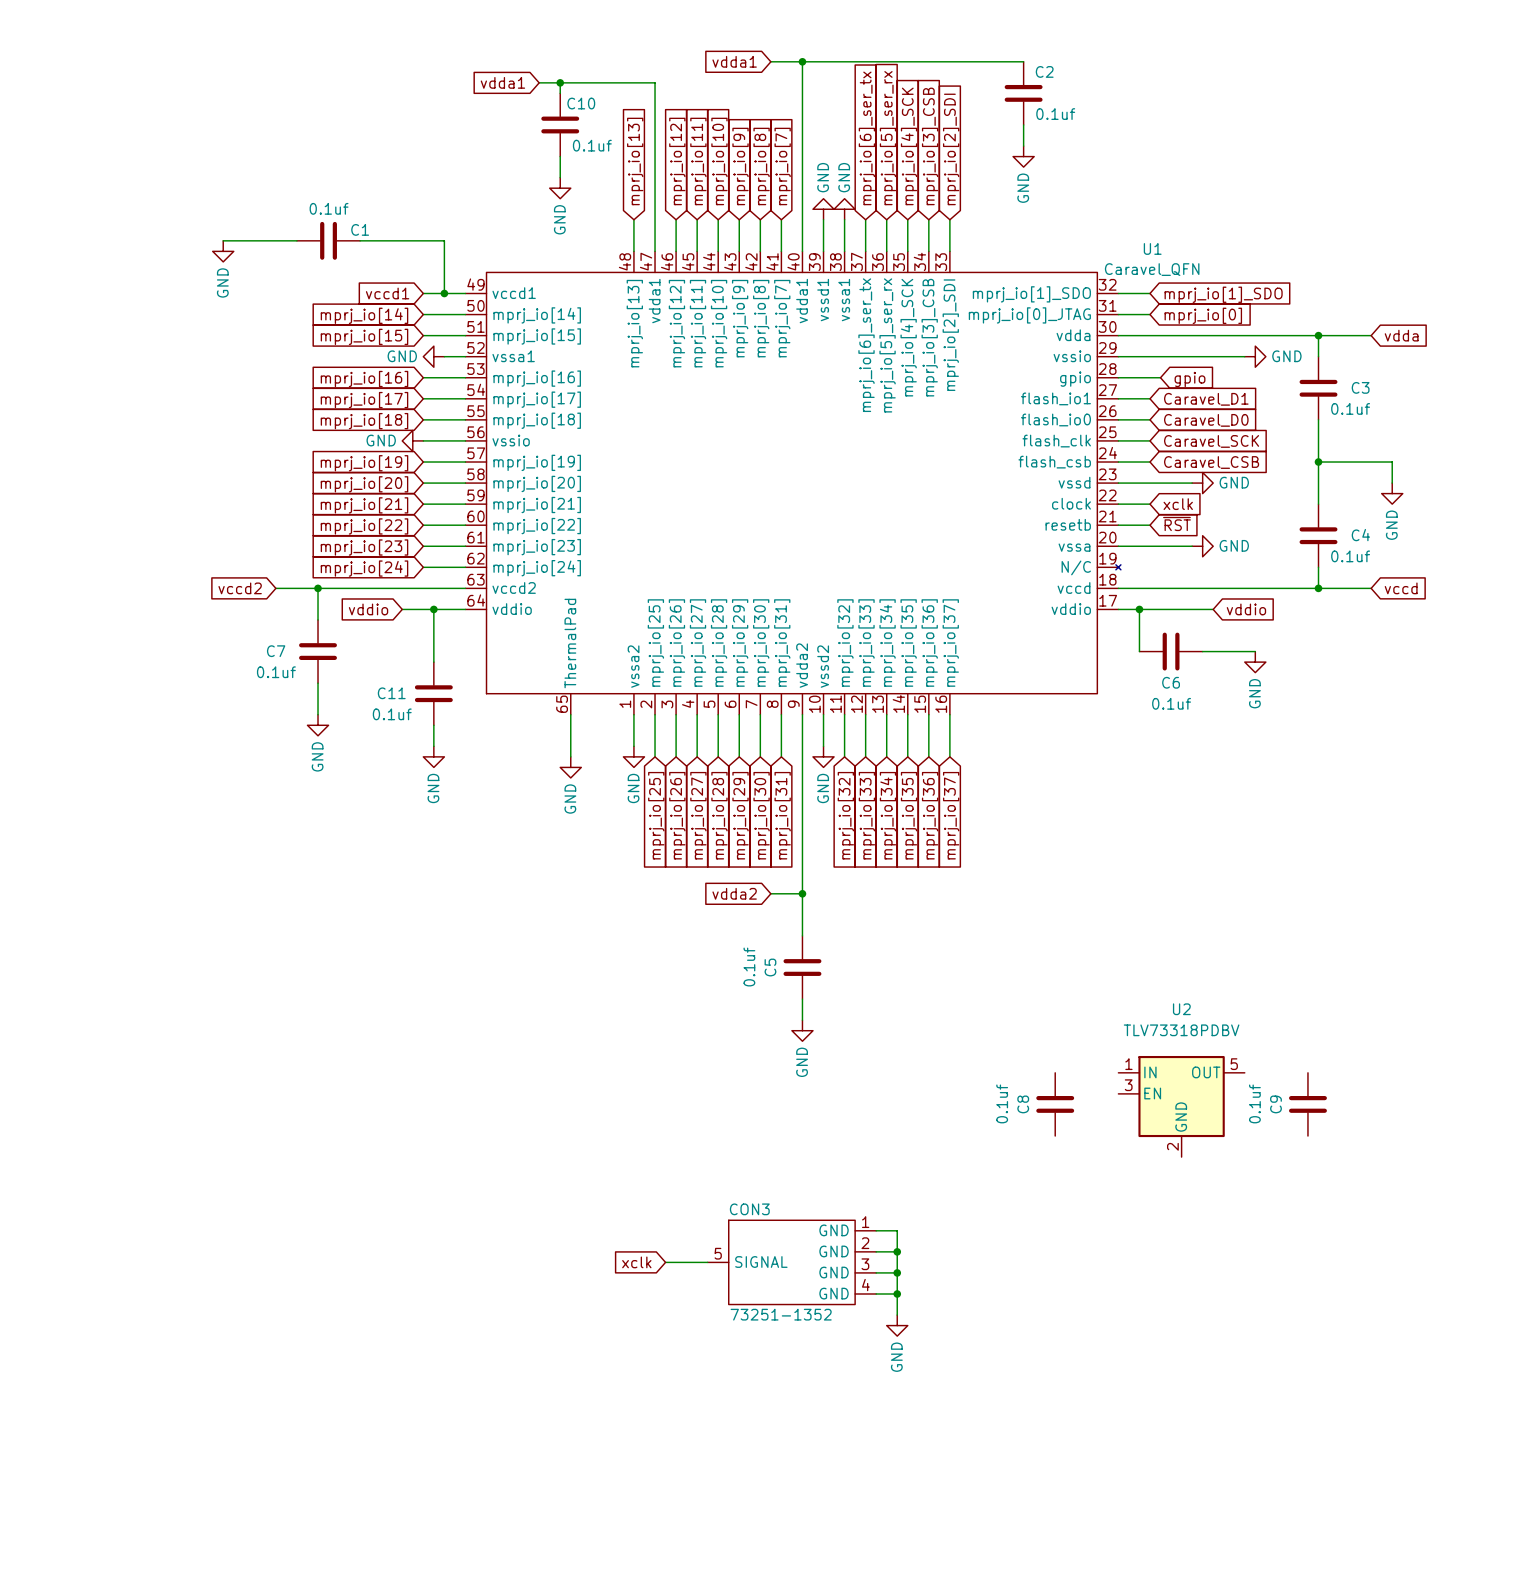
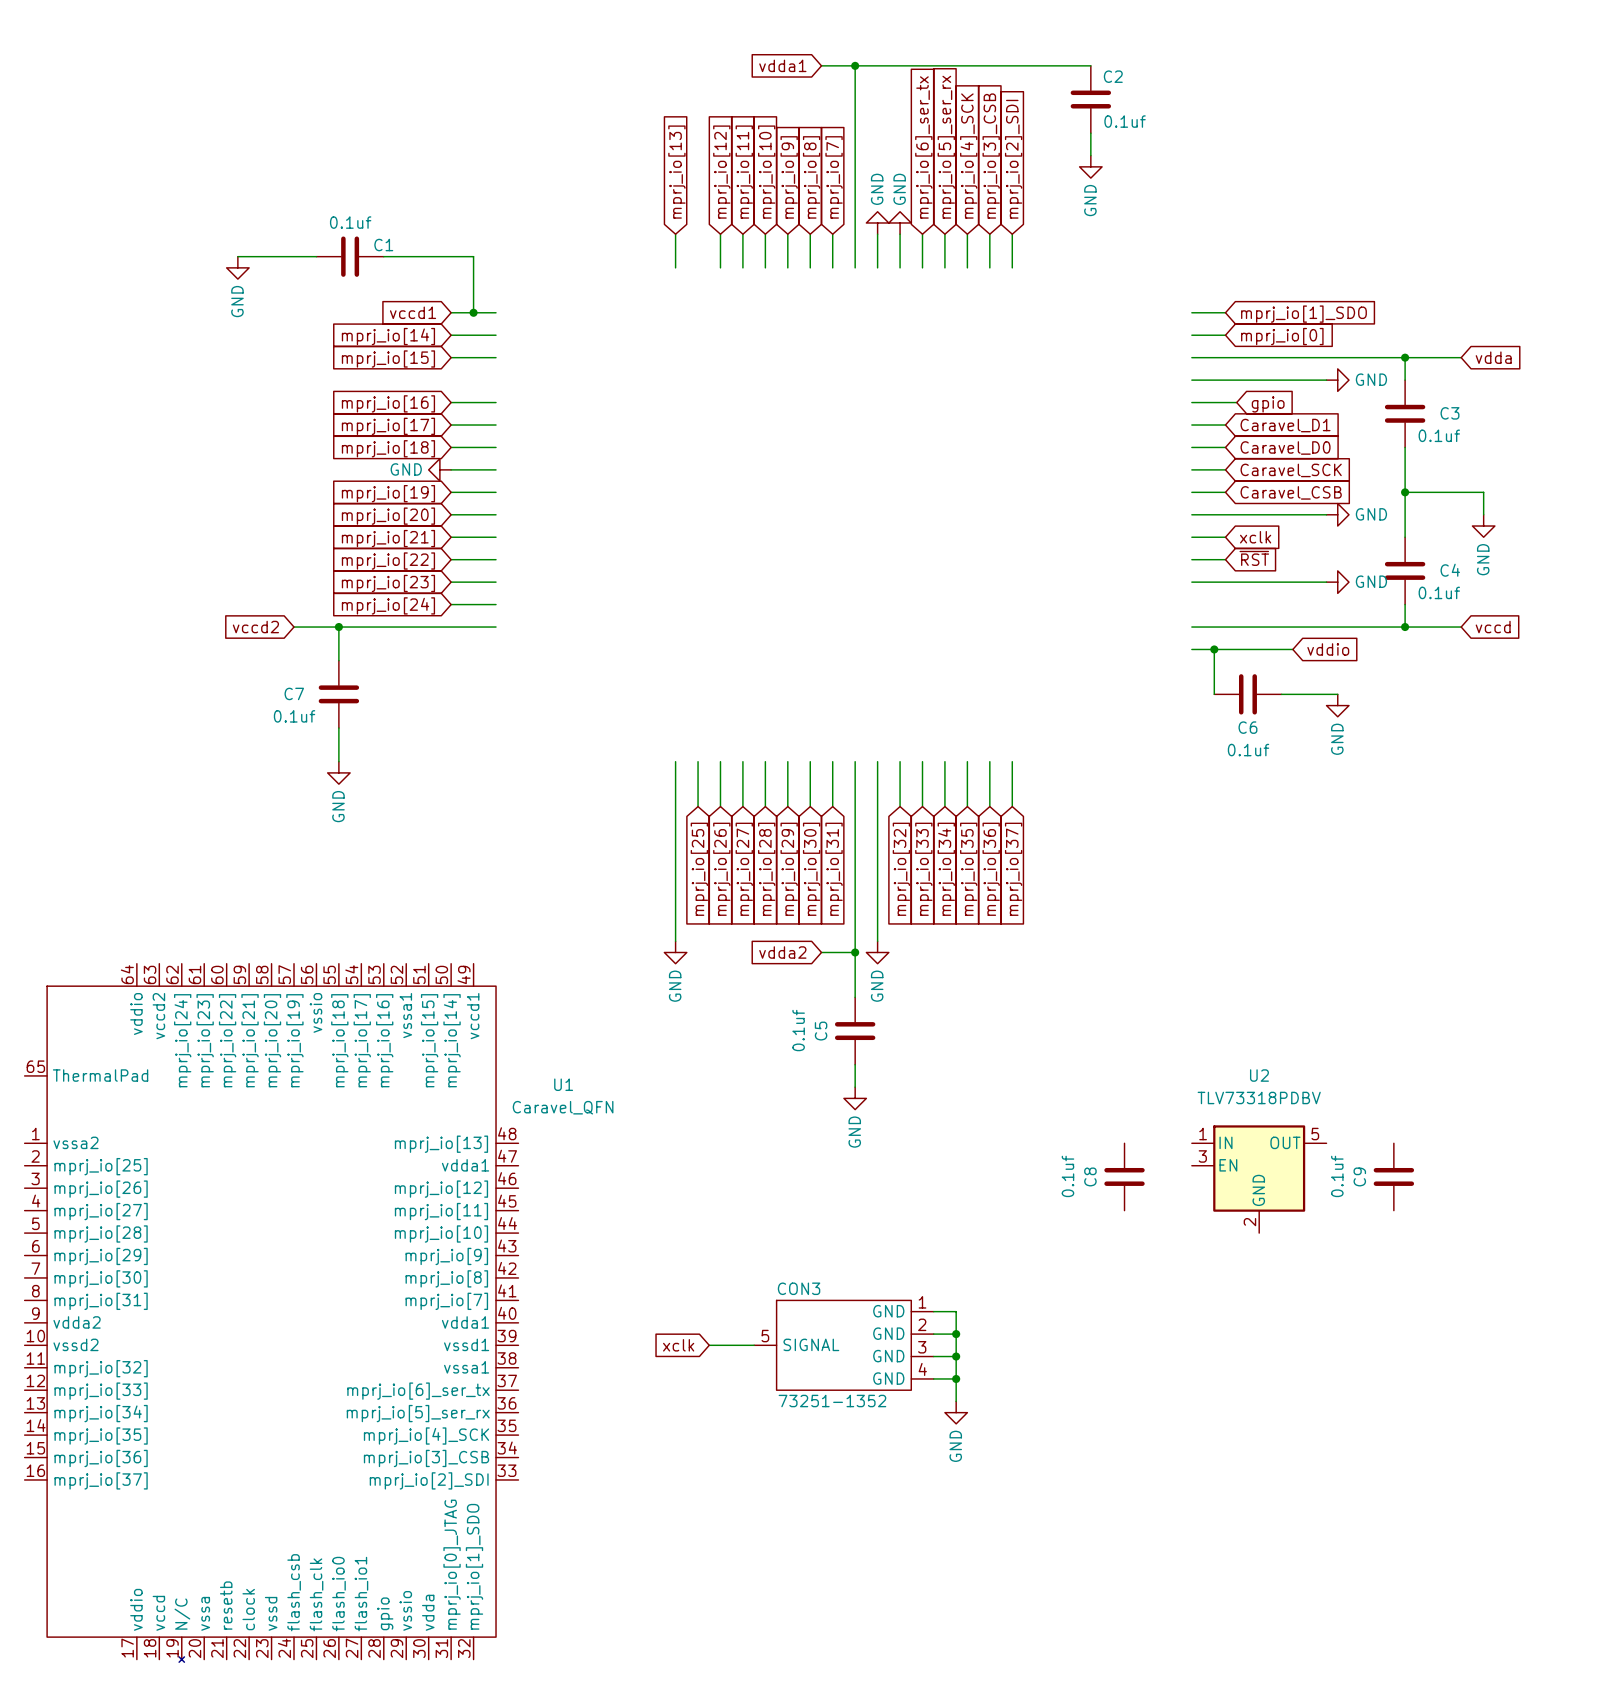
global label: vdda1 (502, 82) -> none
wire: (539, 82) (655, 82) (655, 251) -> none
wire: (560, 82) (560, 93) -> none
junction: (560, 82) -> none
C10: 0.1uf (560, 124) -> none
wire: (560, 156) (560, 177) -> none
power symbol: GND (560, 188) -> none
U1 name position: U1 (1152, 248) -> U1 (563, 1084)
U1 value position: Caravel_QFN (1152, 269) -> Caravel_QFN (563, 1107)
power symbol: GND (433, 356) -> none
wire: (444, 356) (465, 356) -> none
U1 position: (793, 483) -> (271, 1312)
U1 rotation: 0° (803, 483) -> 90° clockwise (271, 1324)
wire: none -> (1270, 514) (1326, 514)
power symbol: GND (1202, 483) -> none
power symbol: none -> GND (1337, 514)
wire: none -> (1270, 582) (1326, 582)
power symbol: GND (1202, 546) -> none
power symbol: none -> GND (1337, 582)
global label: vddio (368, 609) -> none
wire: (402, 609) (465, 609) -> none
wire: (433, 609) (433, 662) -> none
junction: (433, 609) -> none
C11: 0.1uf (433, 693) -> none
wire: (570, 714) (570, 756) -> none
wire: (433, 725) (433, 746) -> none
wire: none -> (675, 795) (675, 941)
wire: none -> (877, 795) (877, 941)
power symbol: GND (433, 756) -> none
power symbol: GND (633, 756) -> none
power symbol: GND (823, 756) -> none
power symbol: GND (570, 767) -> none
power symbol: none -> GND (675, 952)
power symbol: none -> GND (877, 952)

